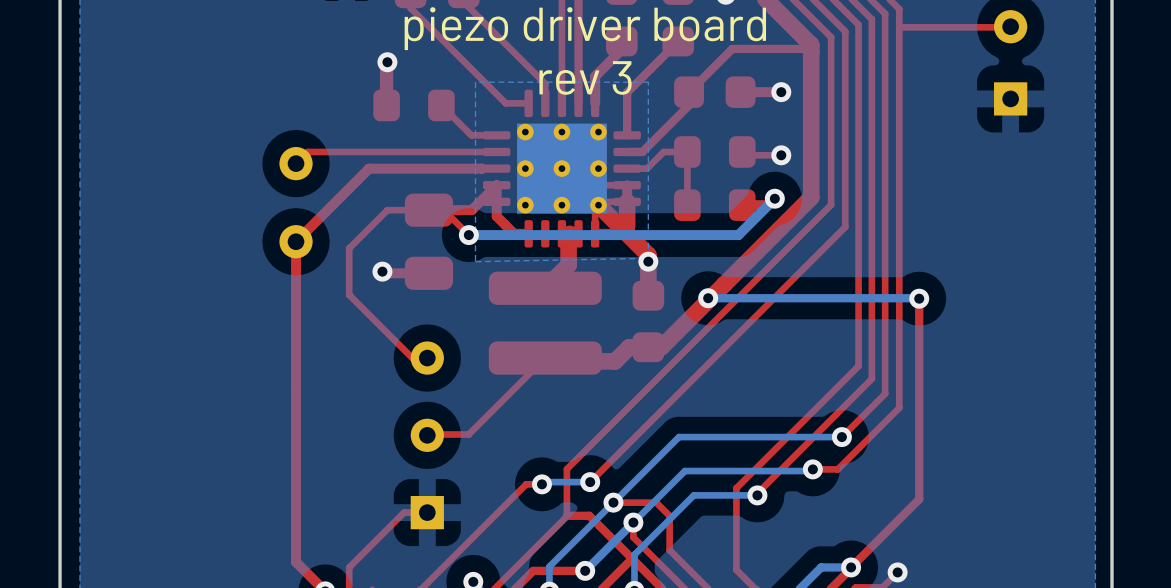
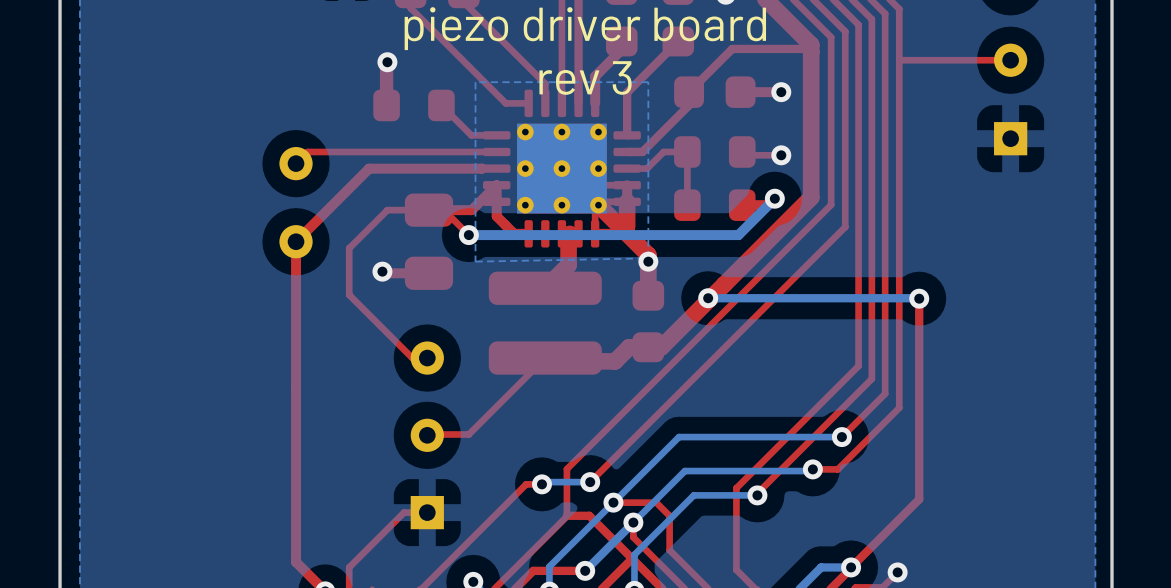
top track: (1010, 26) (899, 27) -> none
part: (1010, 26) -> none
top track: none -> (1010, 60) (899, 60)
part: none -> (1010, 60)
part position: (1010, 98) -> (1010, 138)

